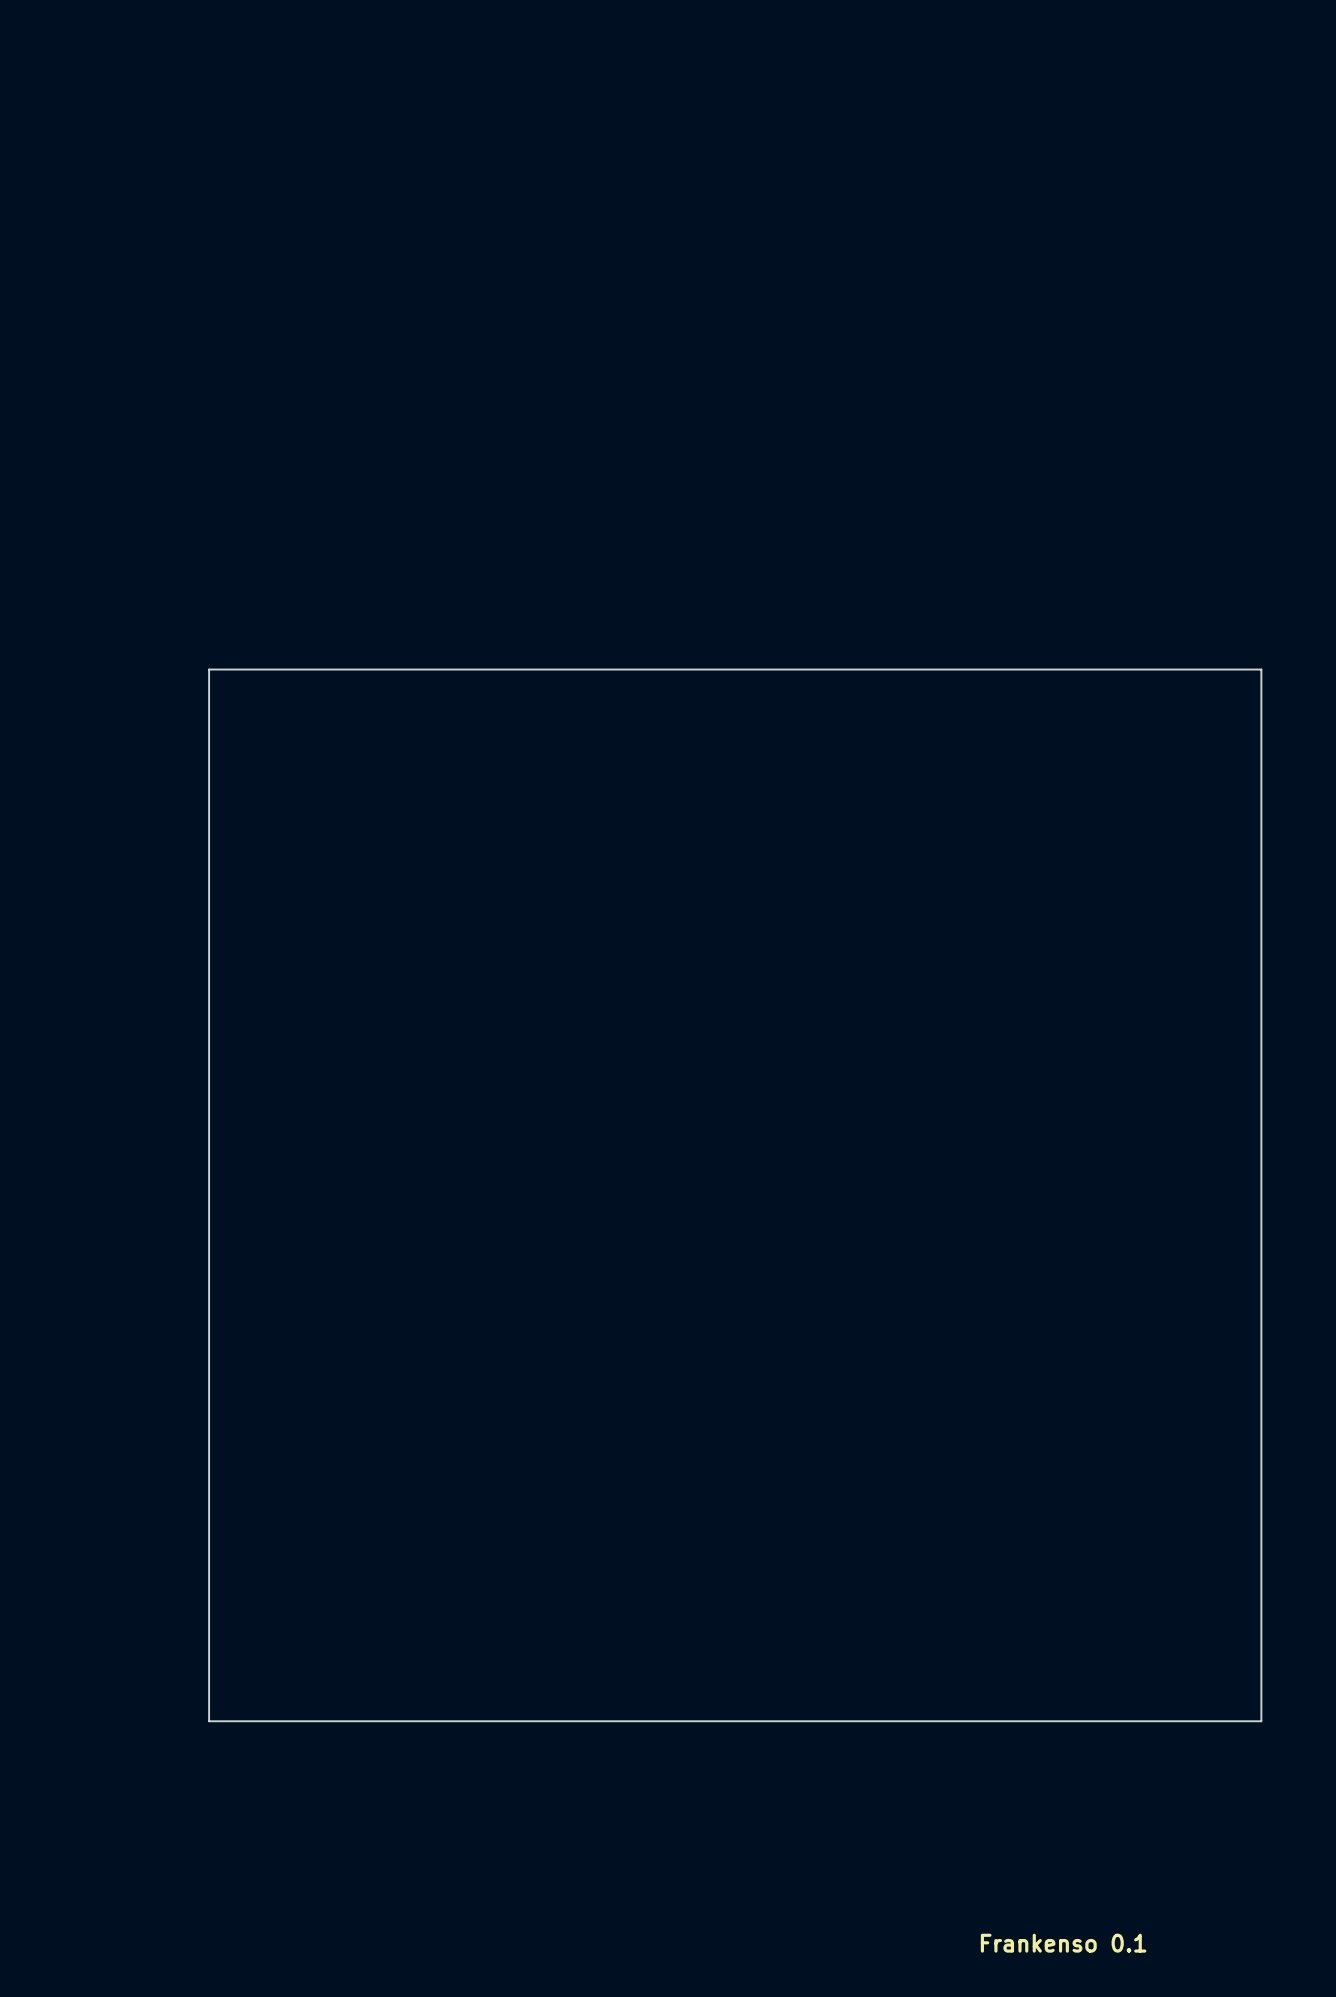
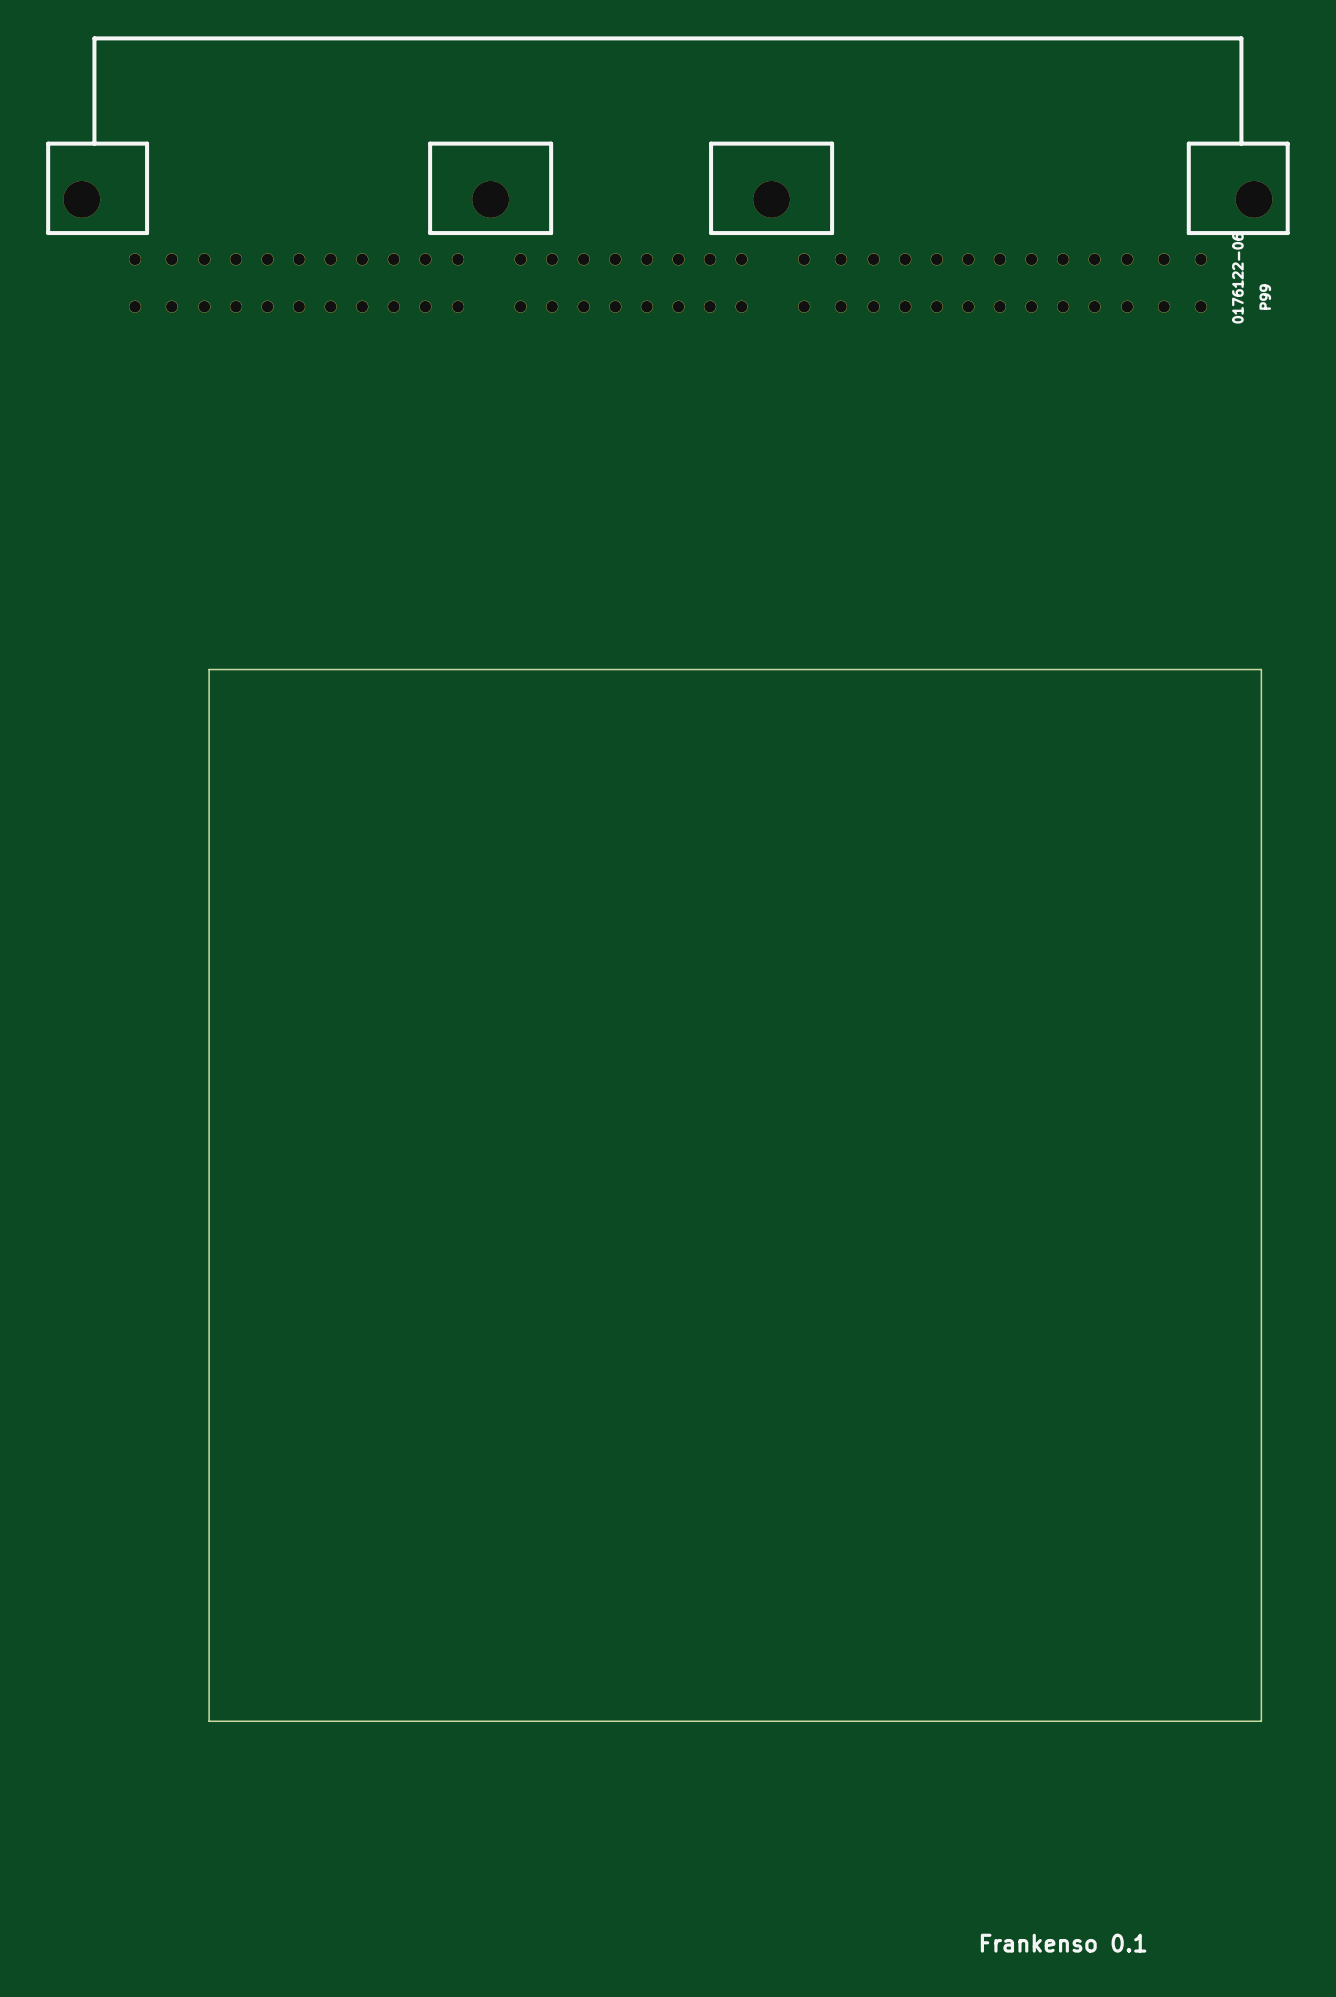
P99: none -> 0176122-06 (667, 174)

